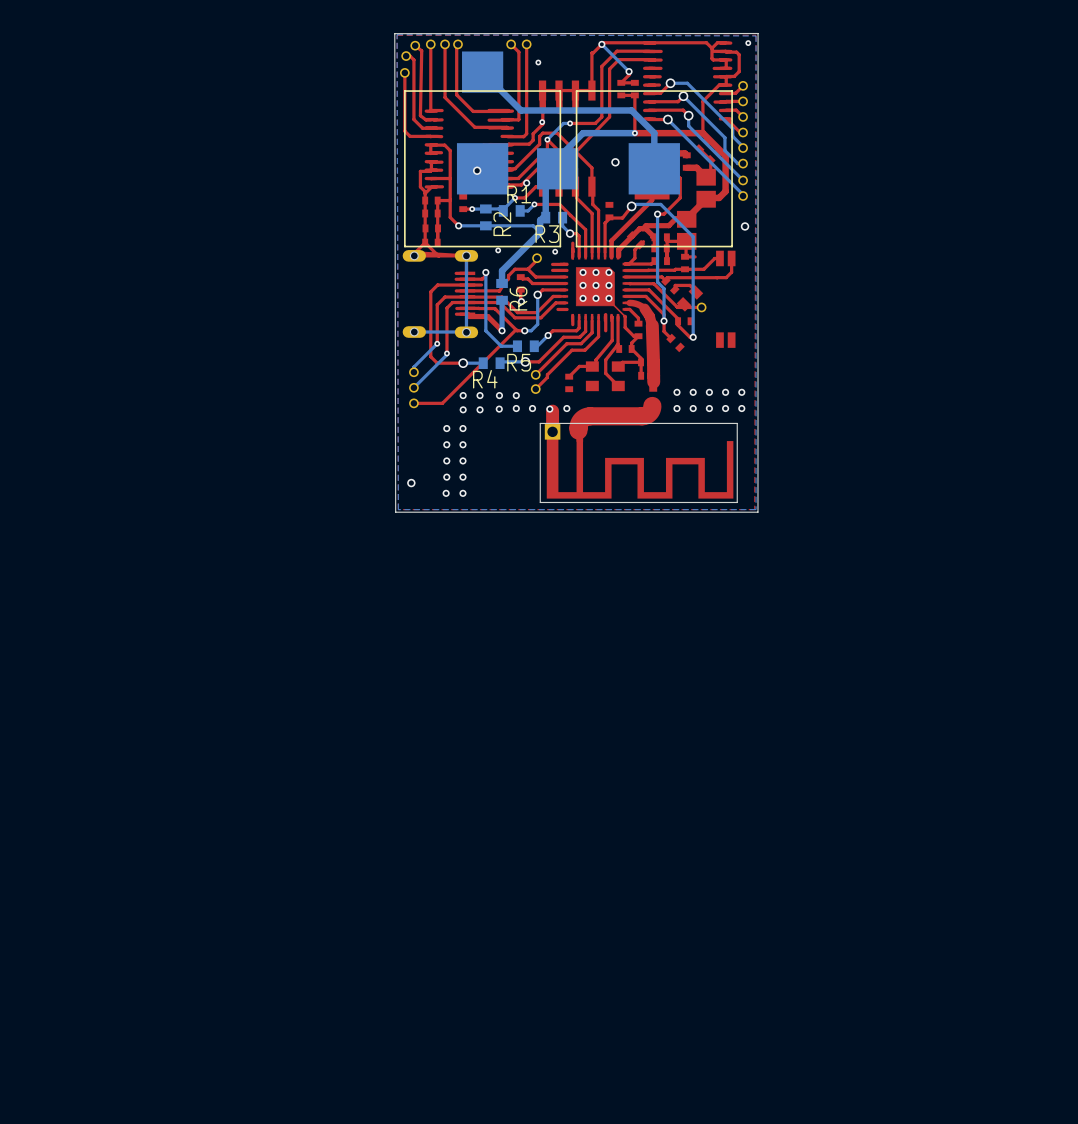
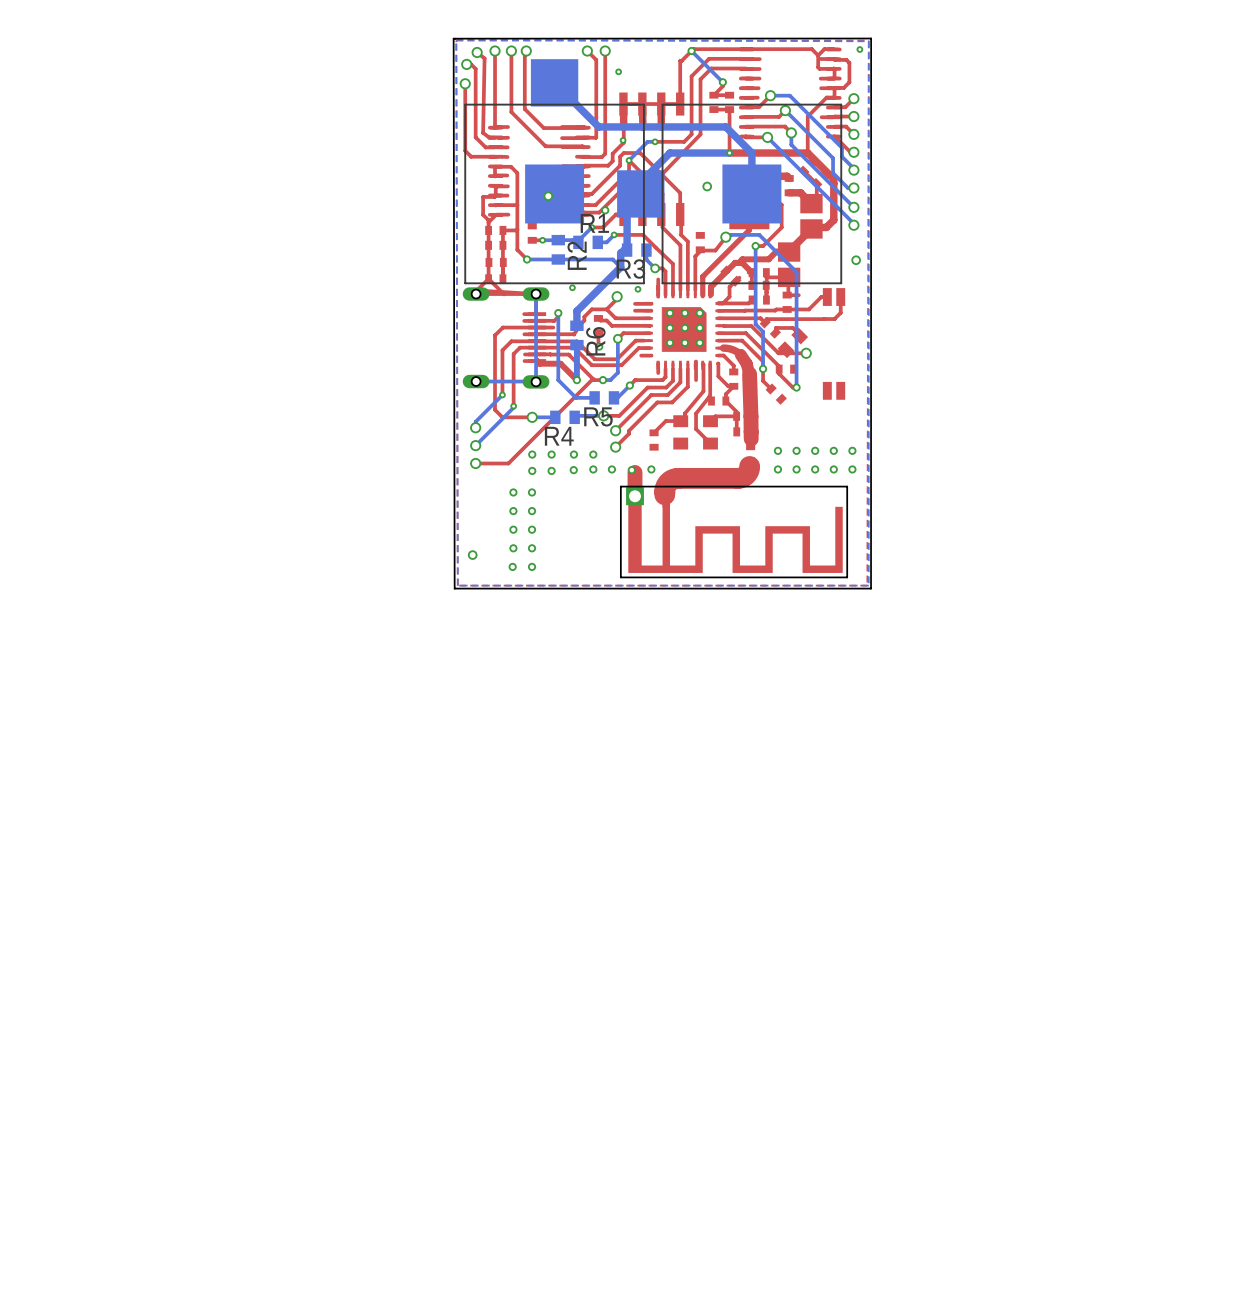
top track: (613, 304) (624, 316) -> none

